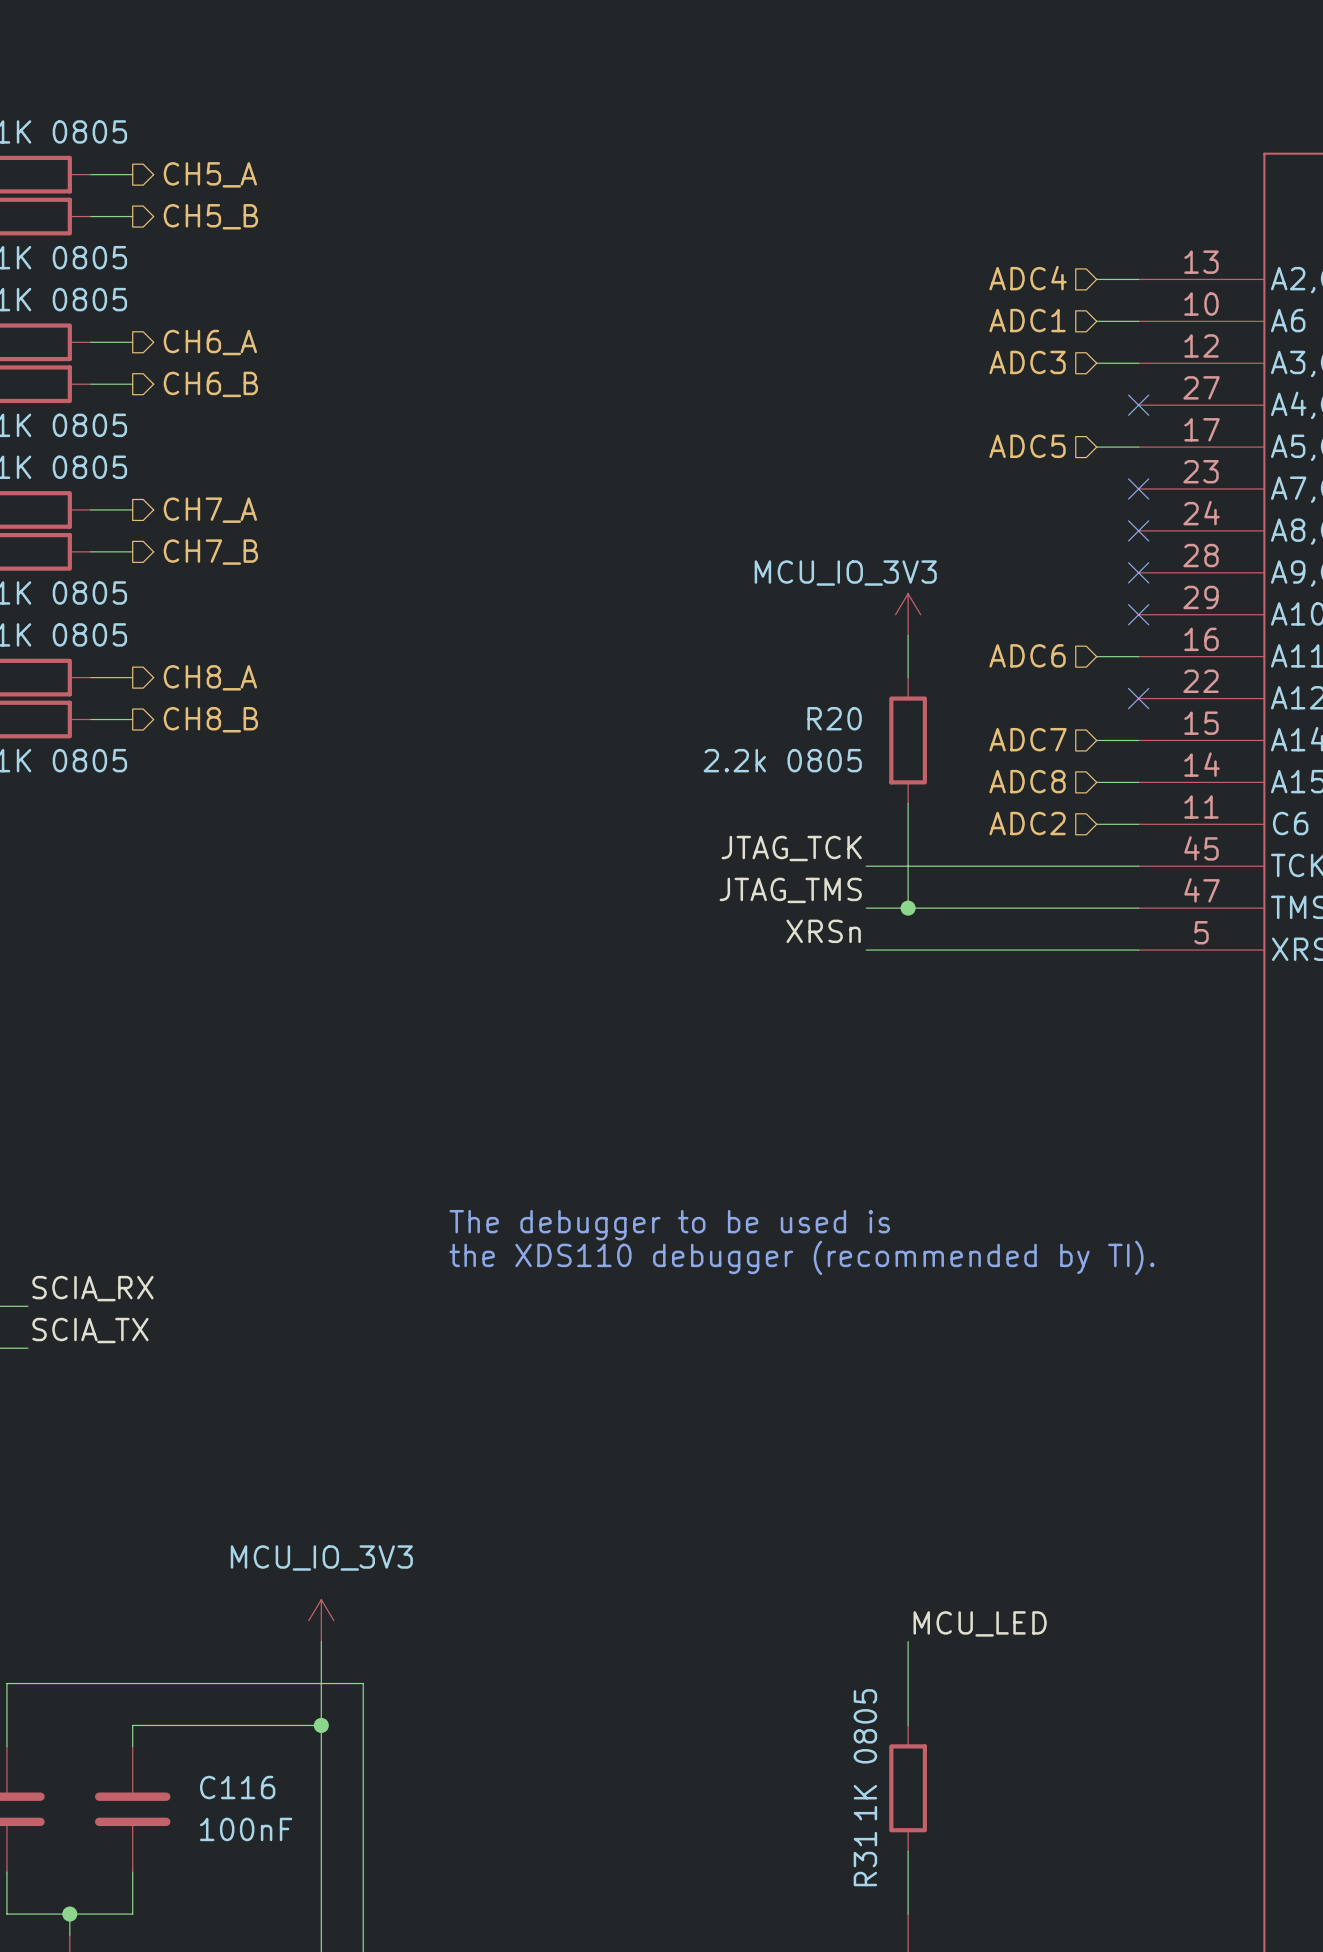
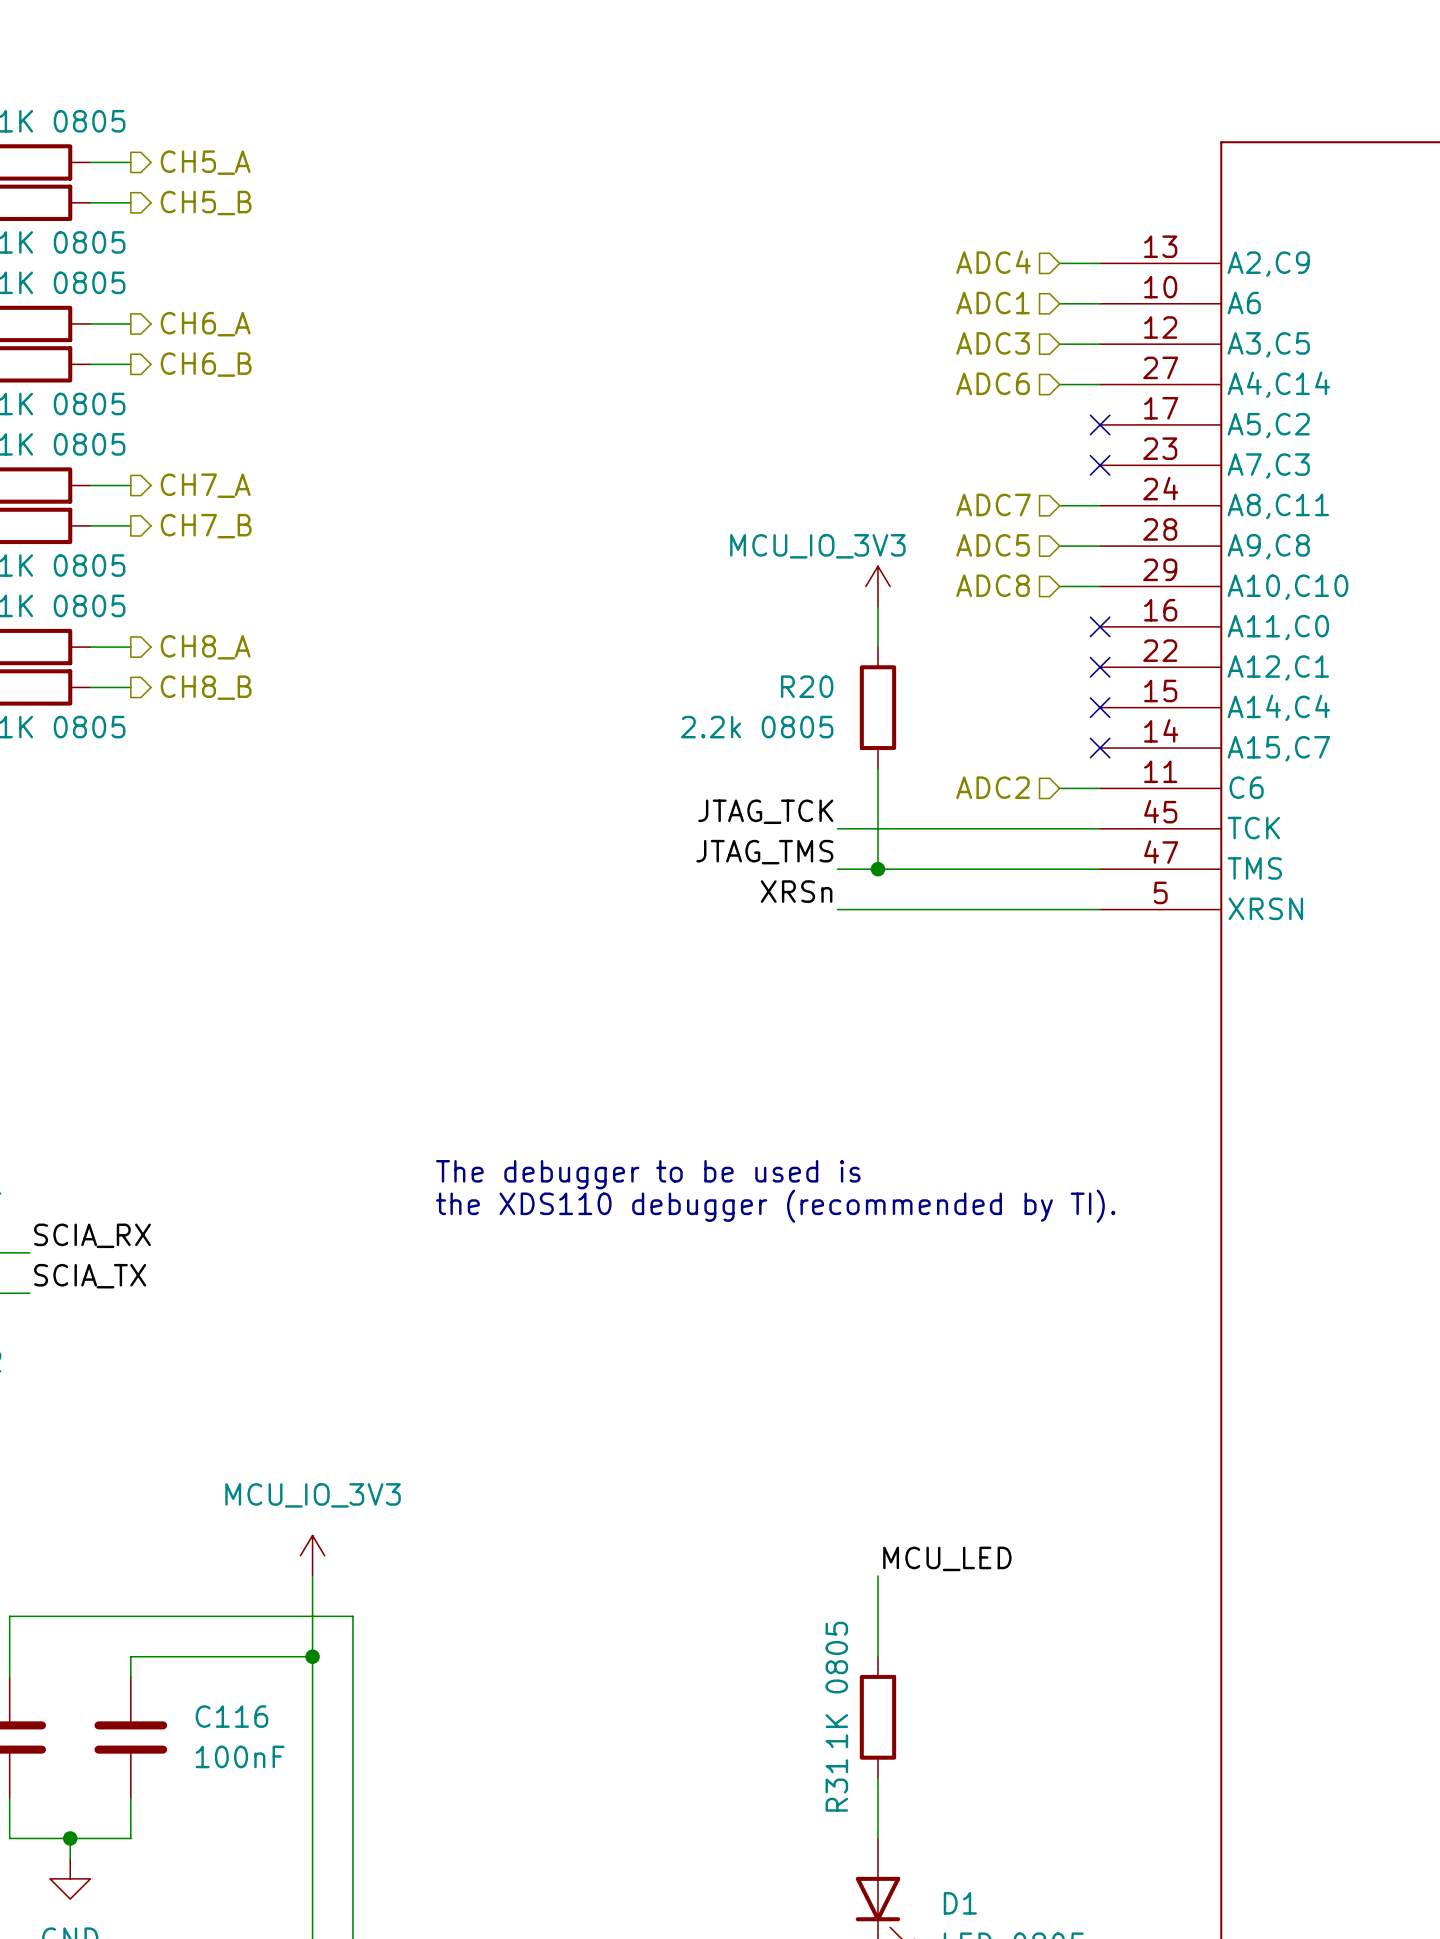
no-connect mark: (1138, 405) -> none
hierarchical label position: ADC5 (1027, 446) -> ADC5 (993, 545)
wire: (1096, 447) (1138, 447) -> (1059, 384) (1100, 384)
no-connect mark: none -> (1100, 424)
no-connect mark: (1138, 530) -> none
no-connect mark: (1138, 572) -> none
no-connect mark: (1138, 614) -> none
hierarchical label position: ADC6 (1027, 655) -> ADC6 (993, 383)
wire: (1096, 656) (1138, 656) -> (1059, 586) (1100, 586)
no-connect mark: none -> (1100, 626)
hierarchical label position: ADC7 (1028, 739) -> ADC7 (993, 504)
wire: (1096, 740) (1138, 740) -> (1059, 546) (1100, 546)
no-connect mark: none -> (1100, 707)
hierarchical label position: ADC8 (1027, 781) -> ADC8 (993, 585)
wire: (1096, 782) (1138, 782) -> (1059, 505) (1100, 505)
no-connect mark: none -> (1100, 748)

